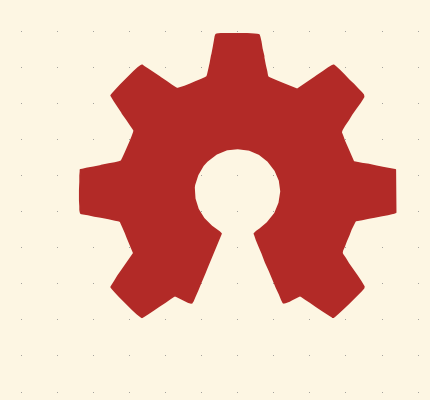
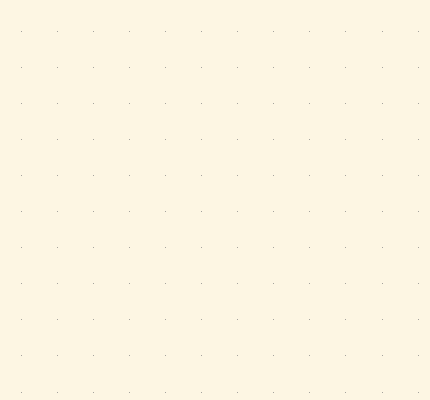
power symbol: (237, 175) -> none

